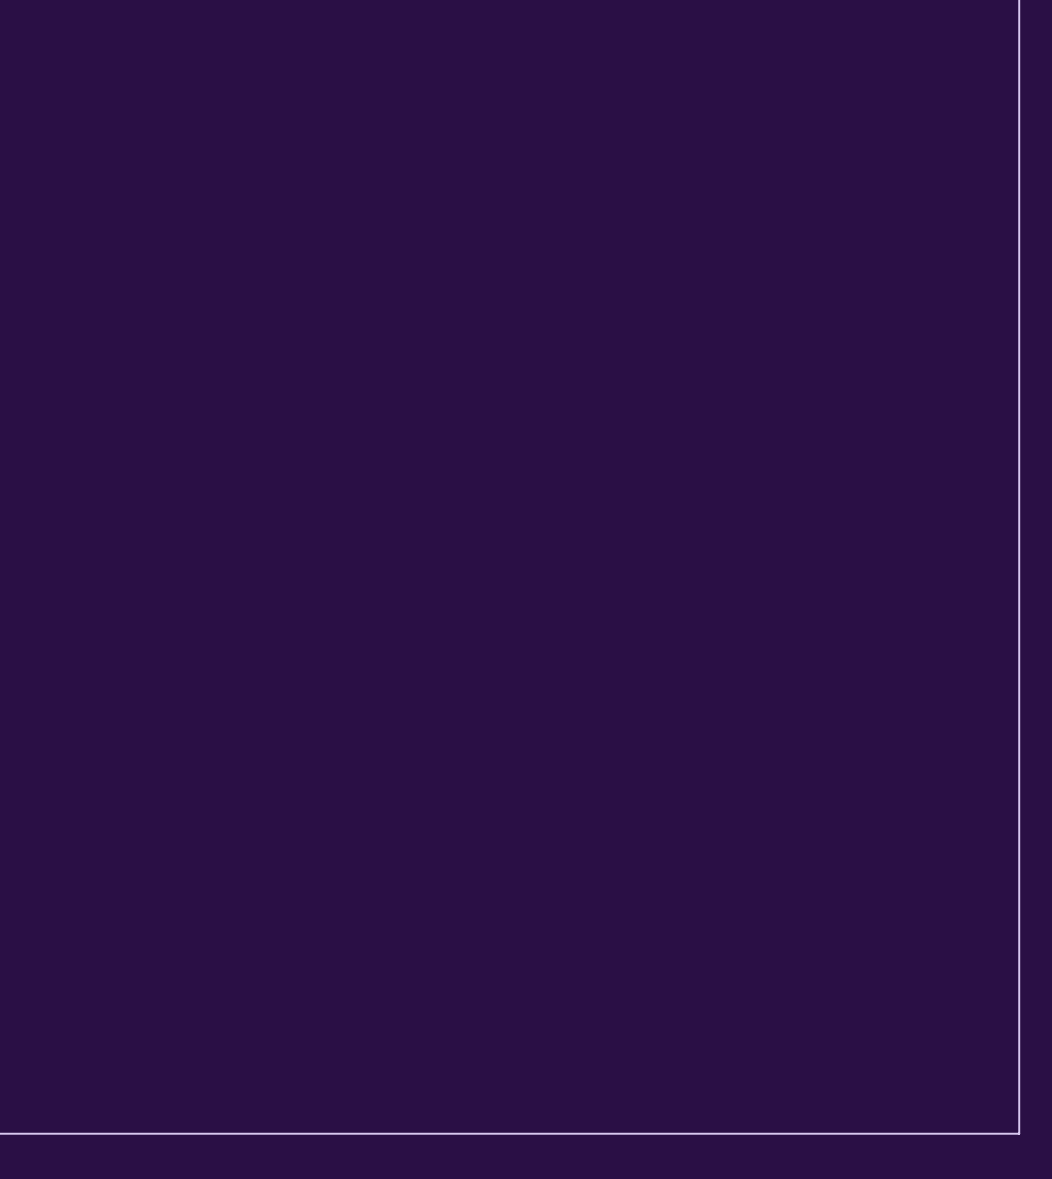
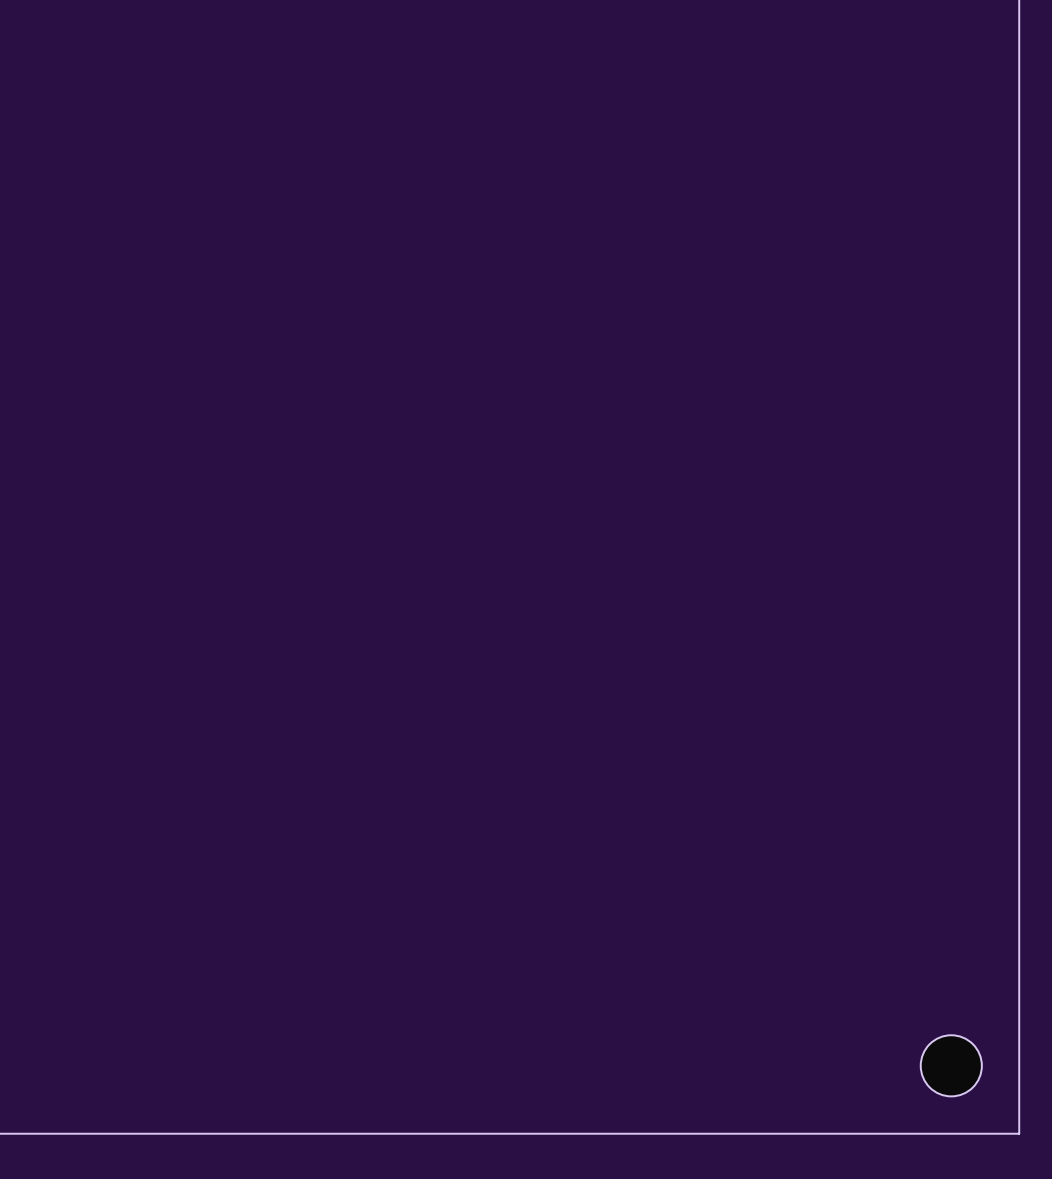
hole: none -> (951, 1065)

